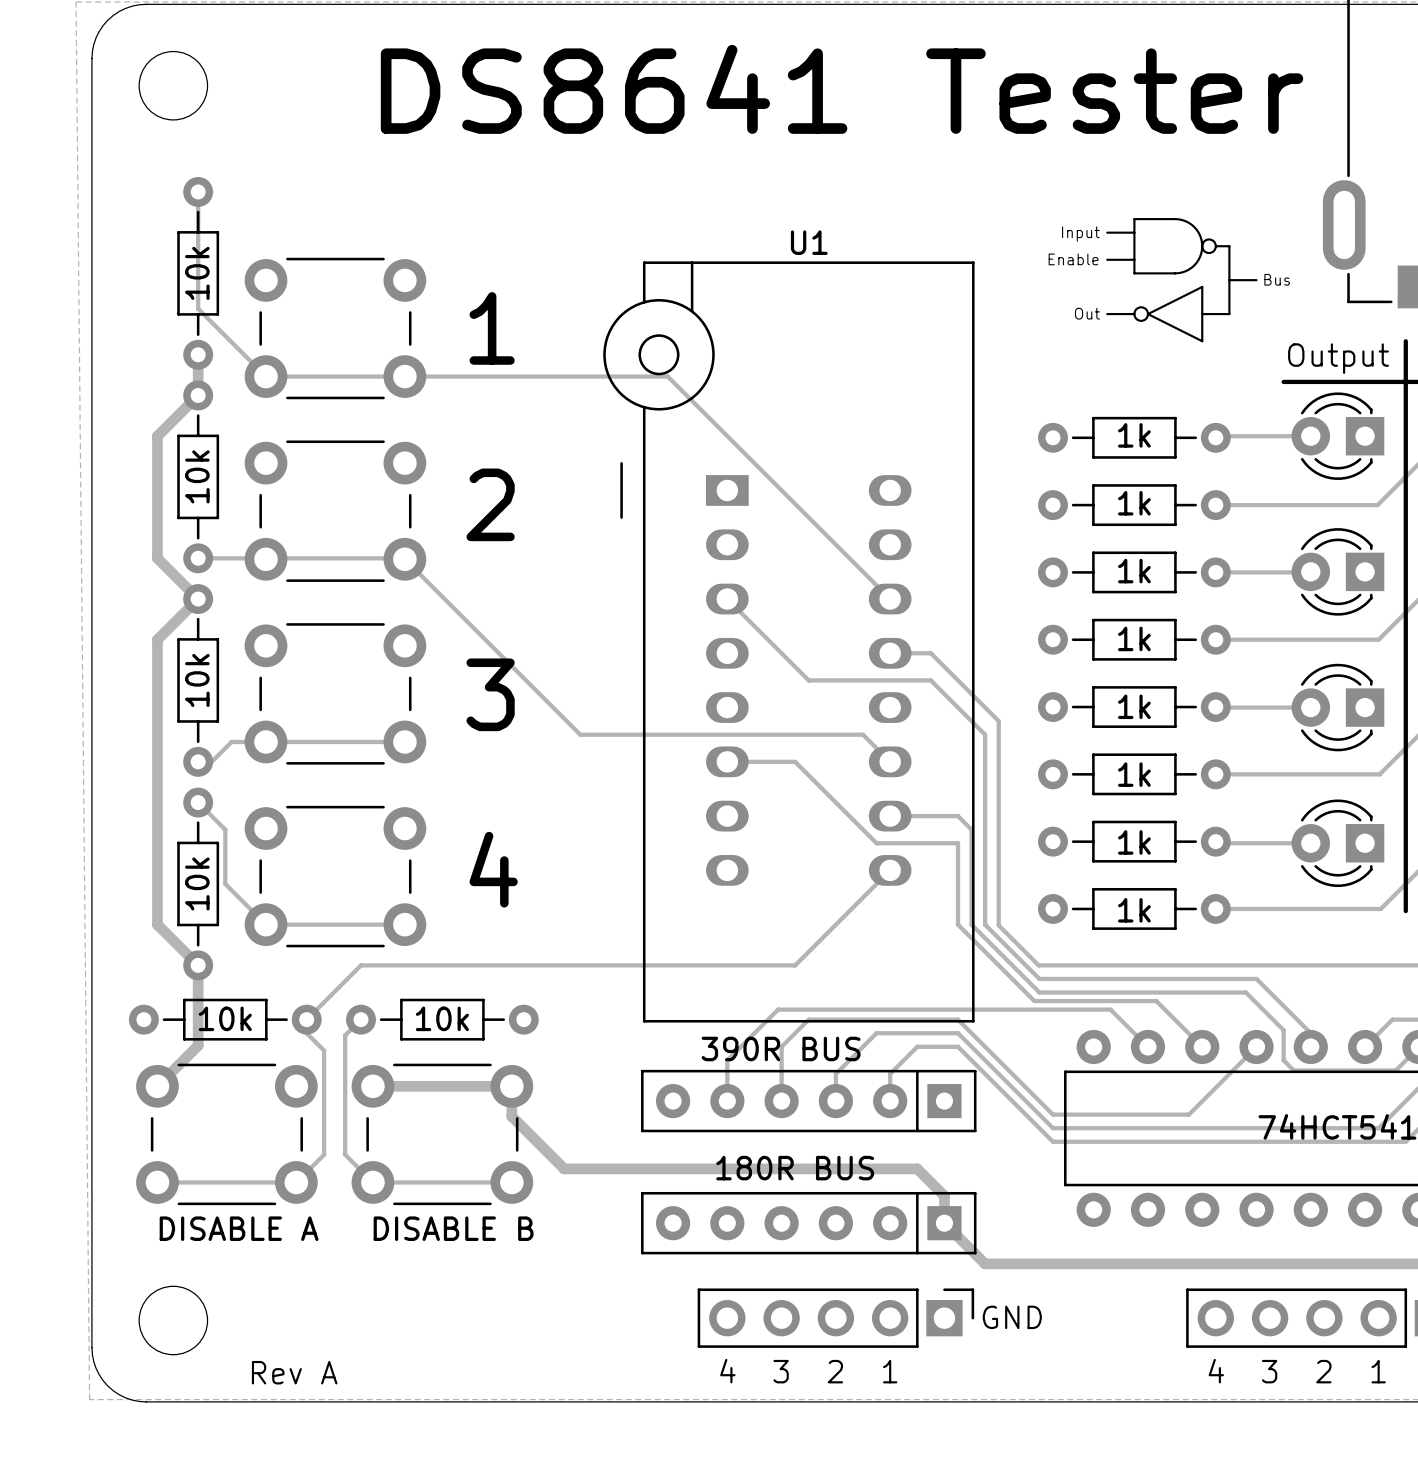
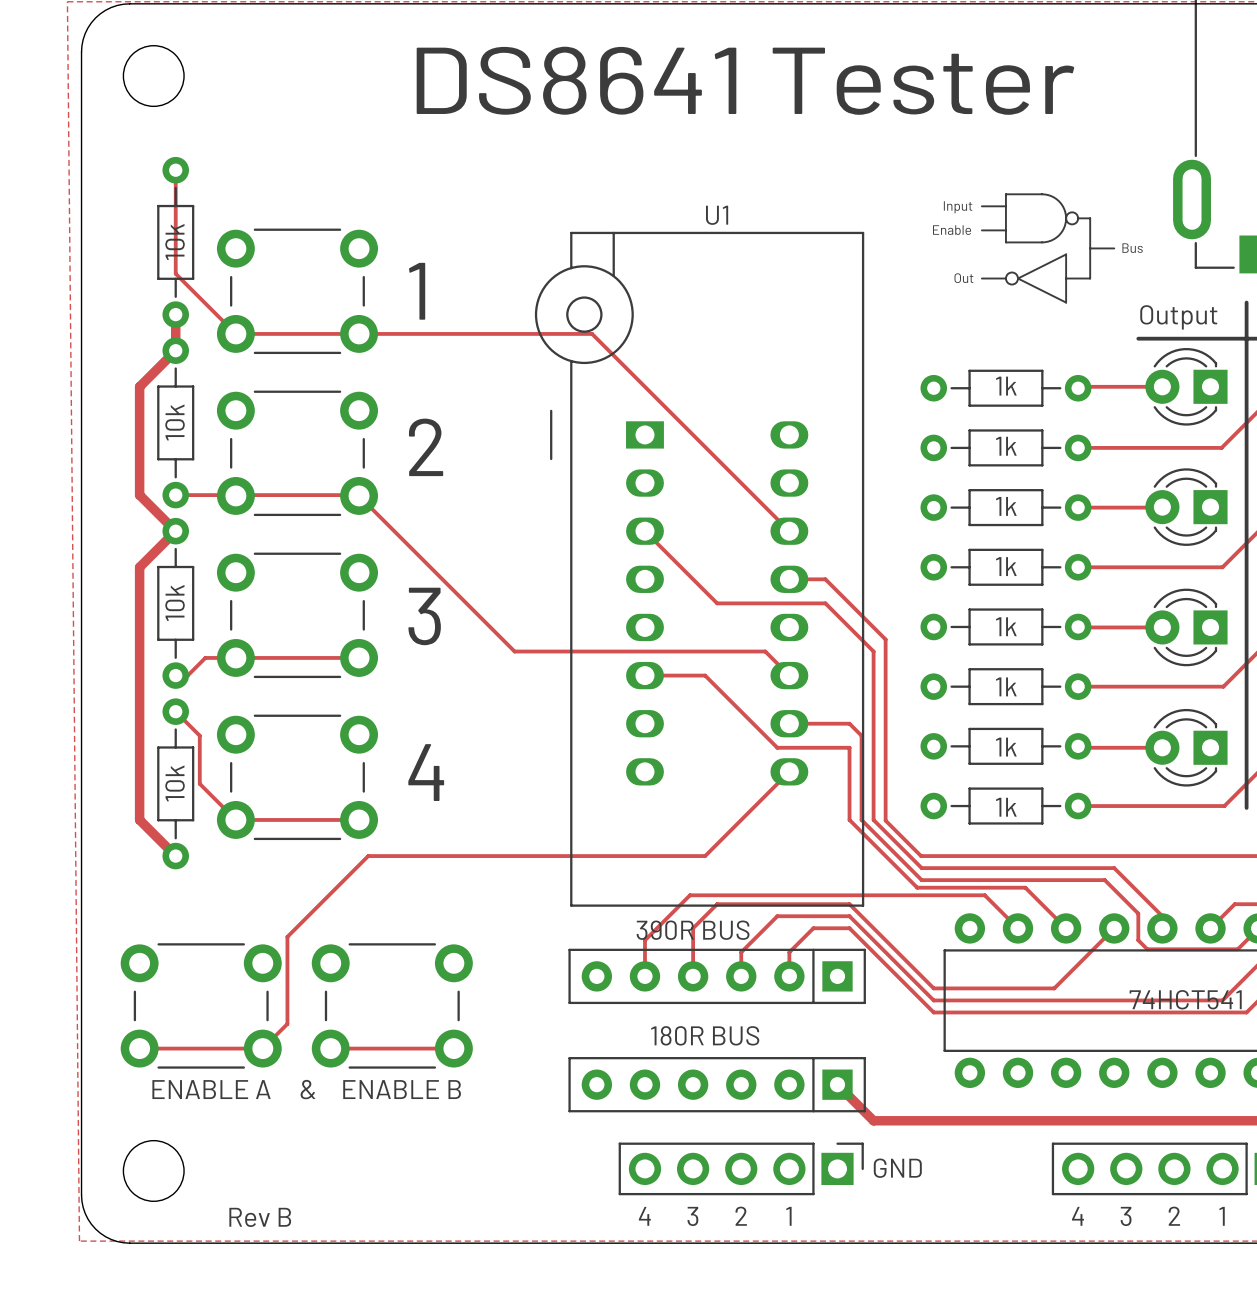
track: (198, 965) (198, 1045) (157, 1086) -> none
track: (415, 965) (360, 965) (306, 1019) (306, 1033) (324, 1050) (324, 1056) -> (368, 856) (320, 904)
part: 10k (225, 1019) -> none
part: 10k (442, 1019) -> none
track: (345, 1035) (345, 1154) (372, 1182) -> (306, 918) (287, 936)
track: (372, 1086) (511, 1086) (511, 1116) (564, 1168) (917, 1168) (944, 1196) (944, 1223) -> none
part value: DISABLE A (239, 1228) -> ENABLE A (211, 1089)
text: none -> & (307, 1089)
part value: DISABLE B (453, 1228) -> ENABLE B (402, 1089)
text: Rev A (294, 1372) -> Rev B (260, 1217)

